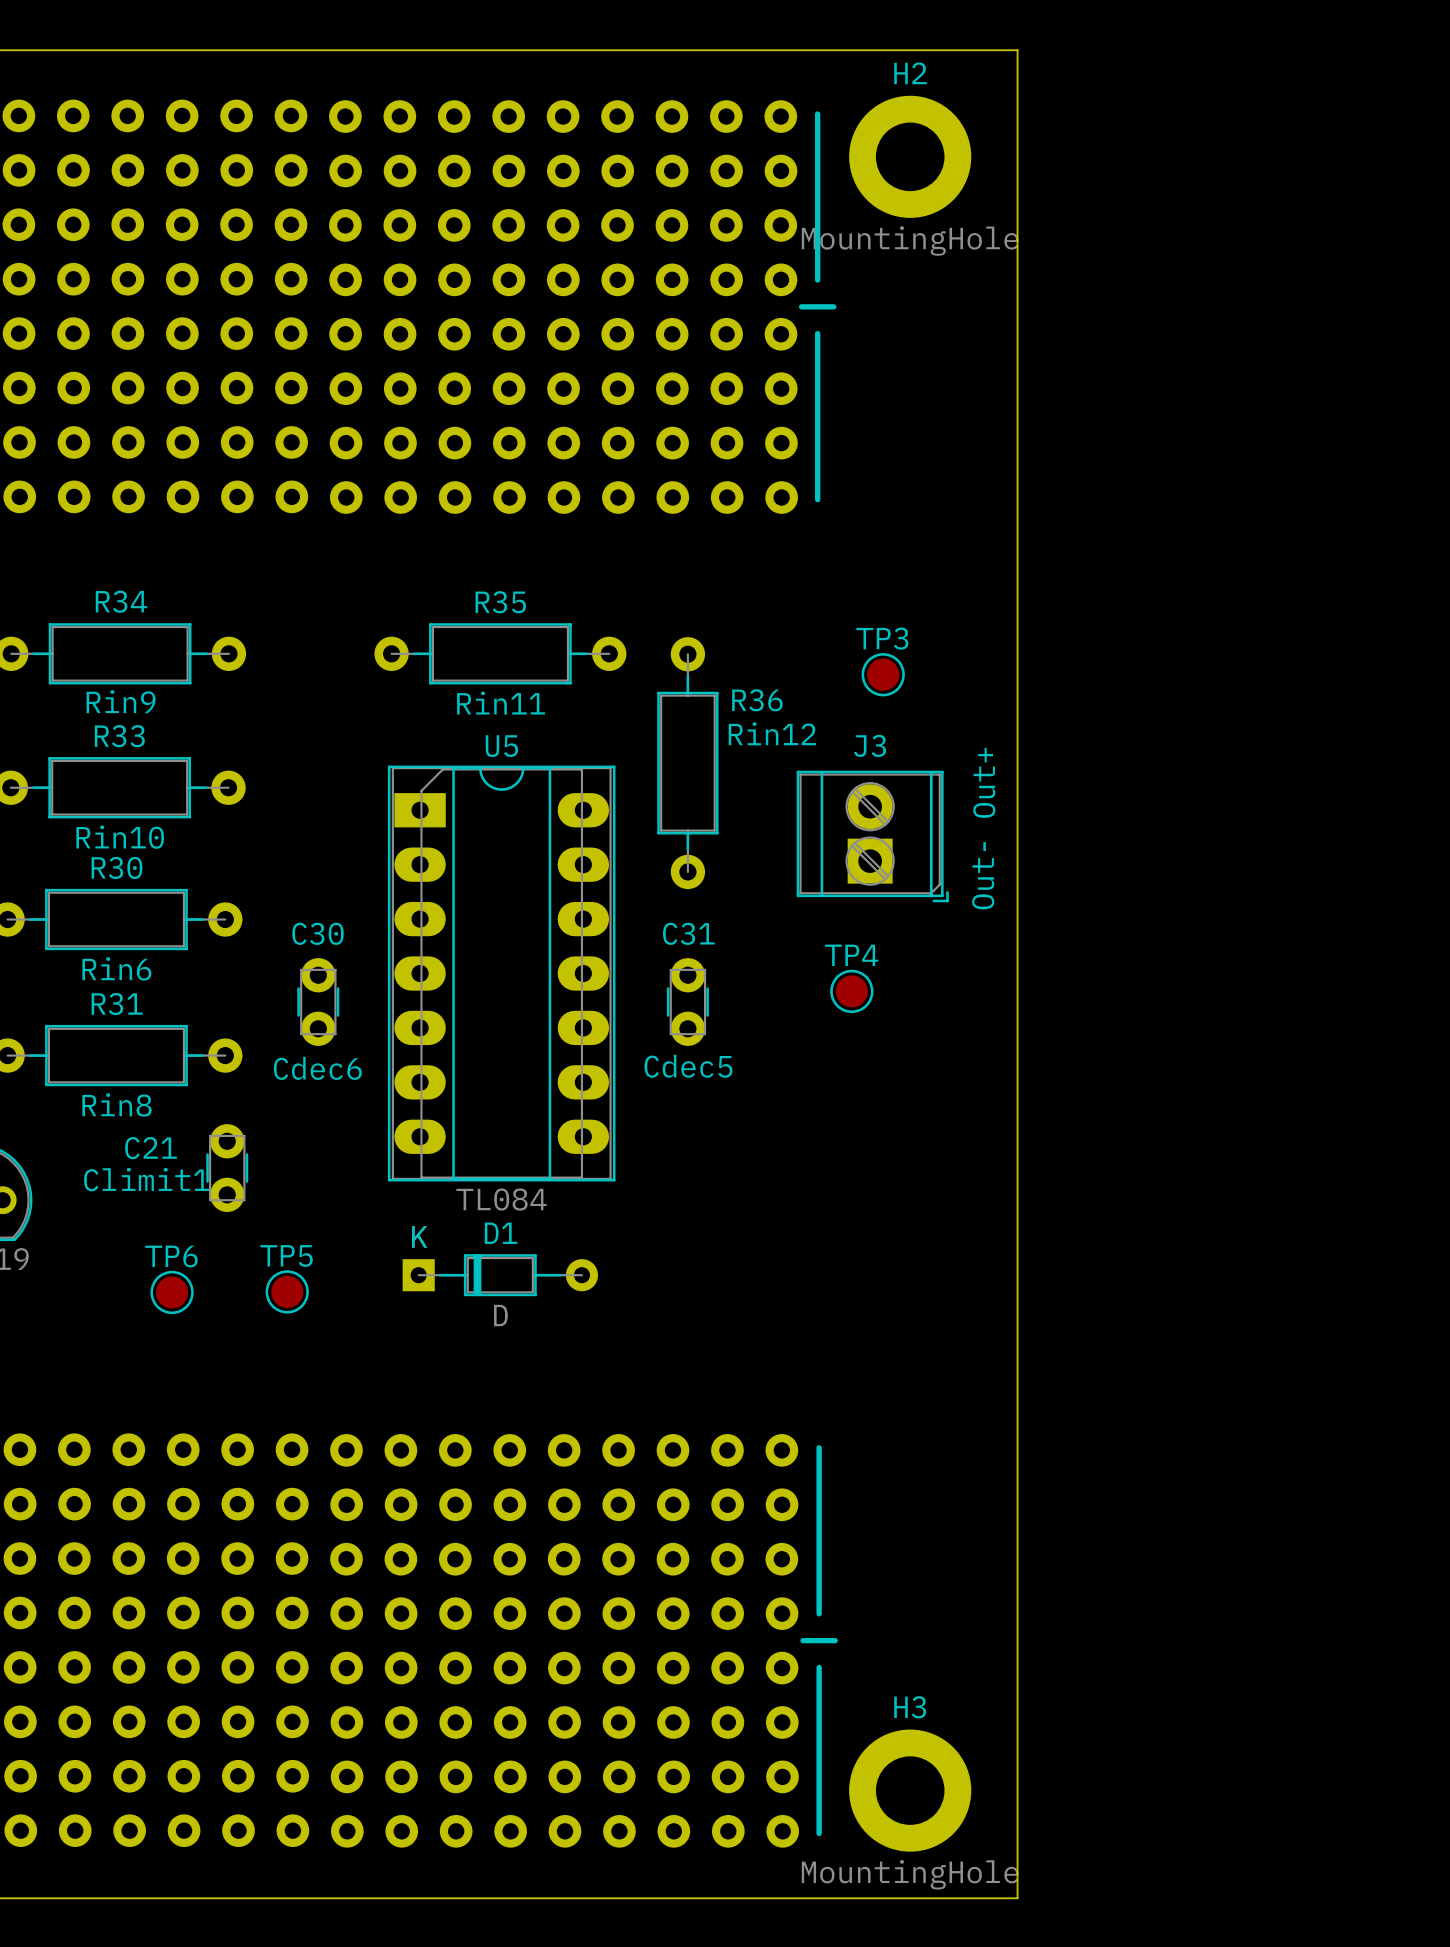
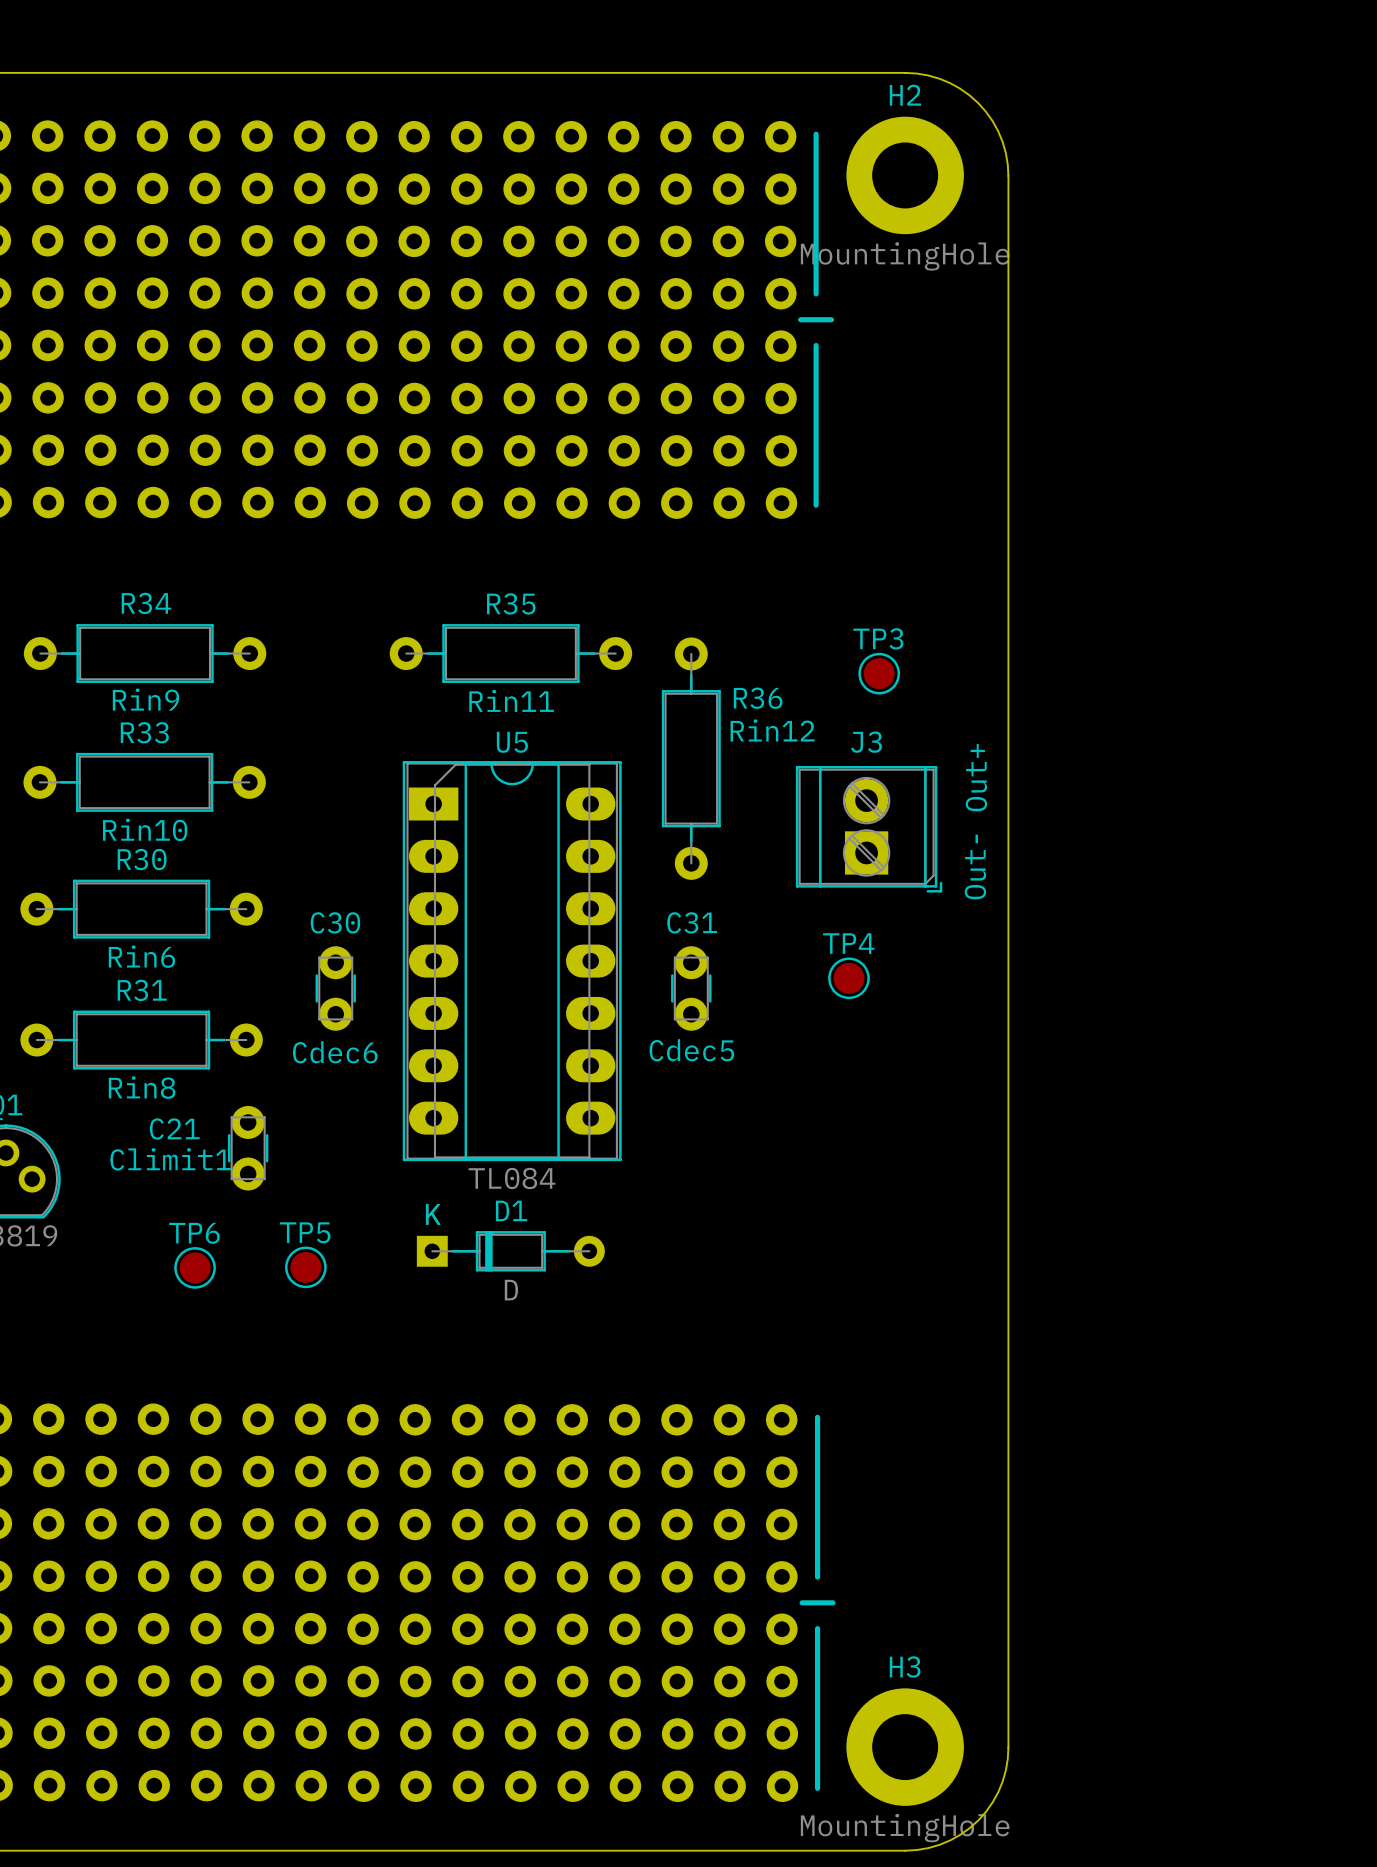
board edge: (910, 50) (1017, 50) (1017, 157) -> (905, 72) (939, 78) (960, 88) (978, 103) (998, 131) (1005, 153) (1008, 175)
board edge: (1017, 1791) (1017, 1898) (910, 1898) -> (1008, 1747) (1002, 1781) (992, 1802) (978, 1820) (950, 1840) (928, 1848) (905, 1850)

